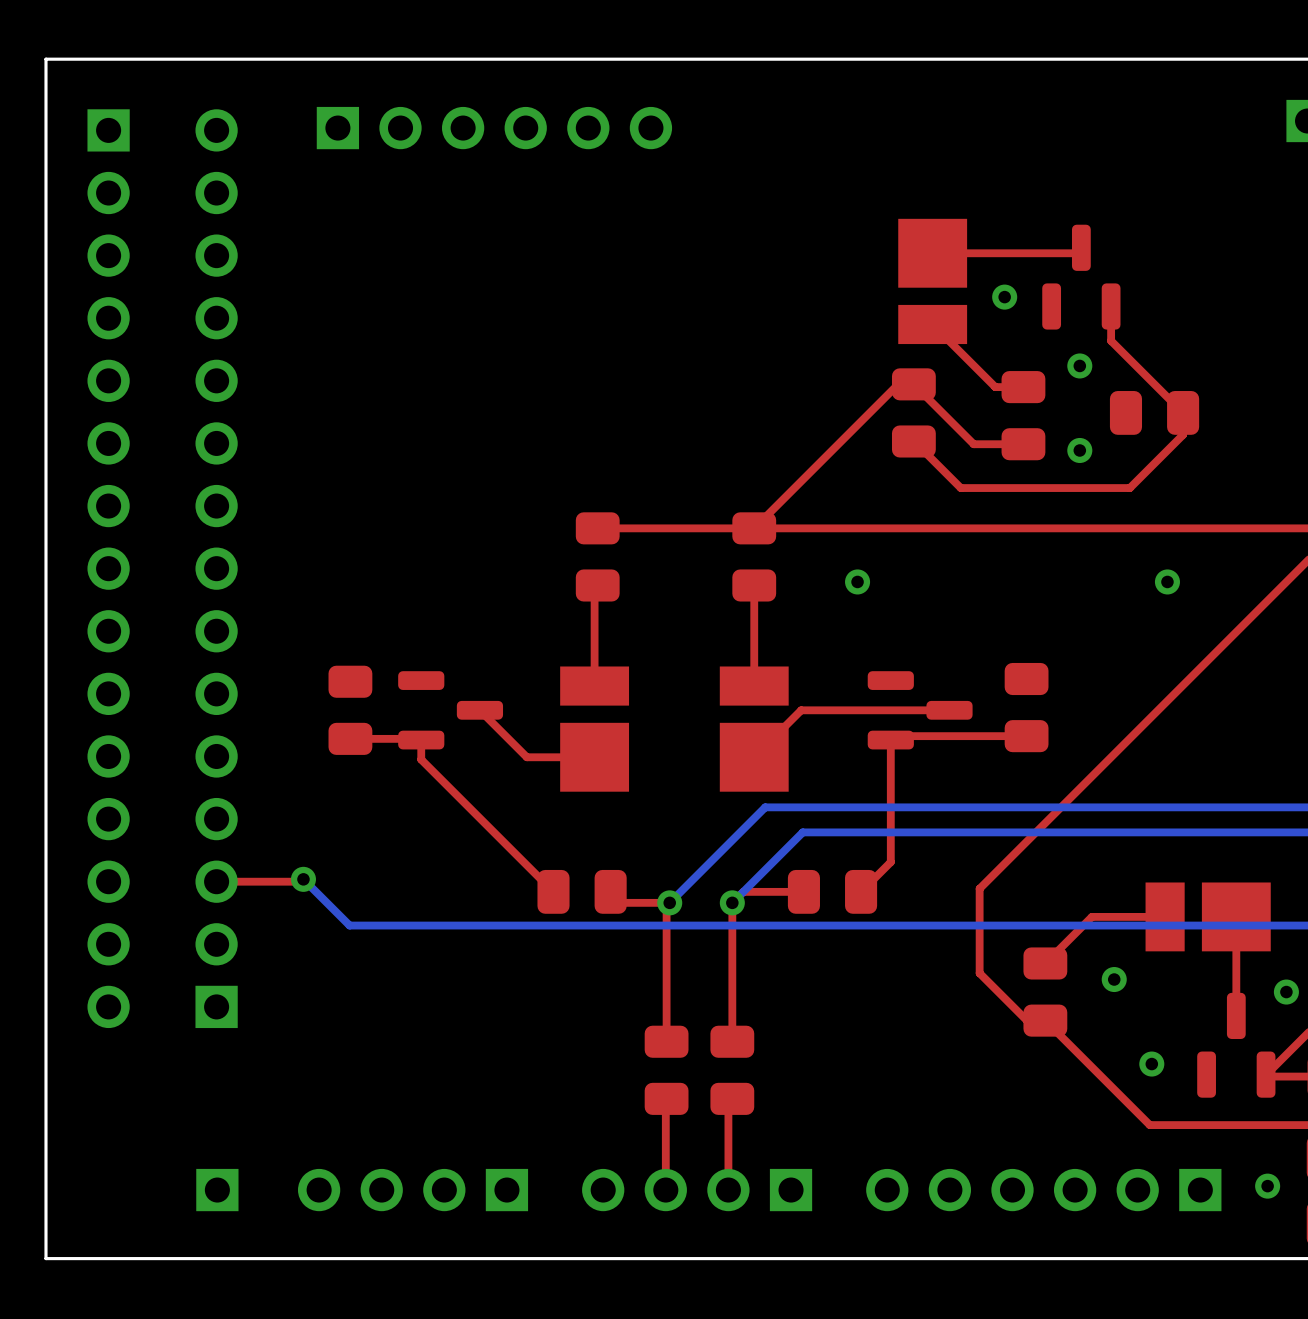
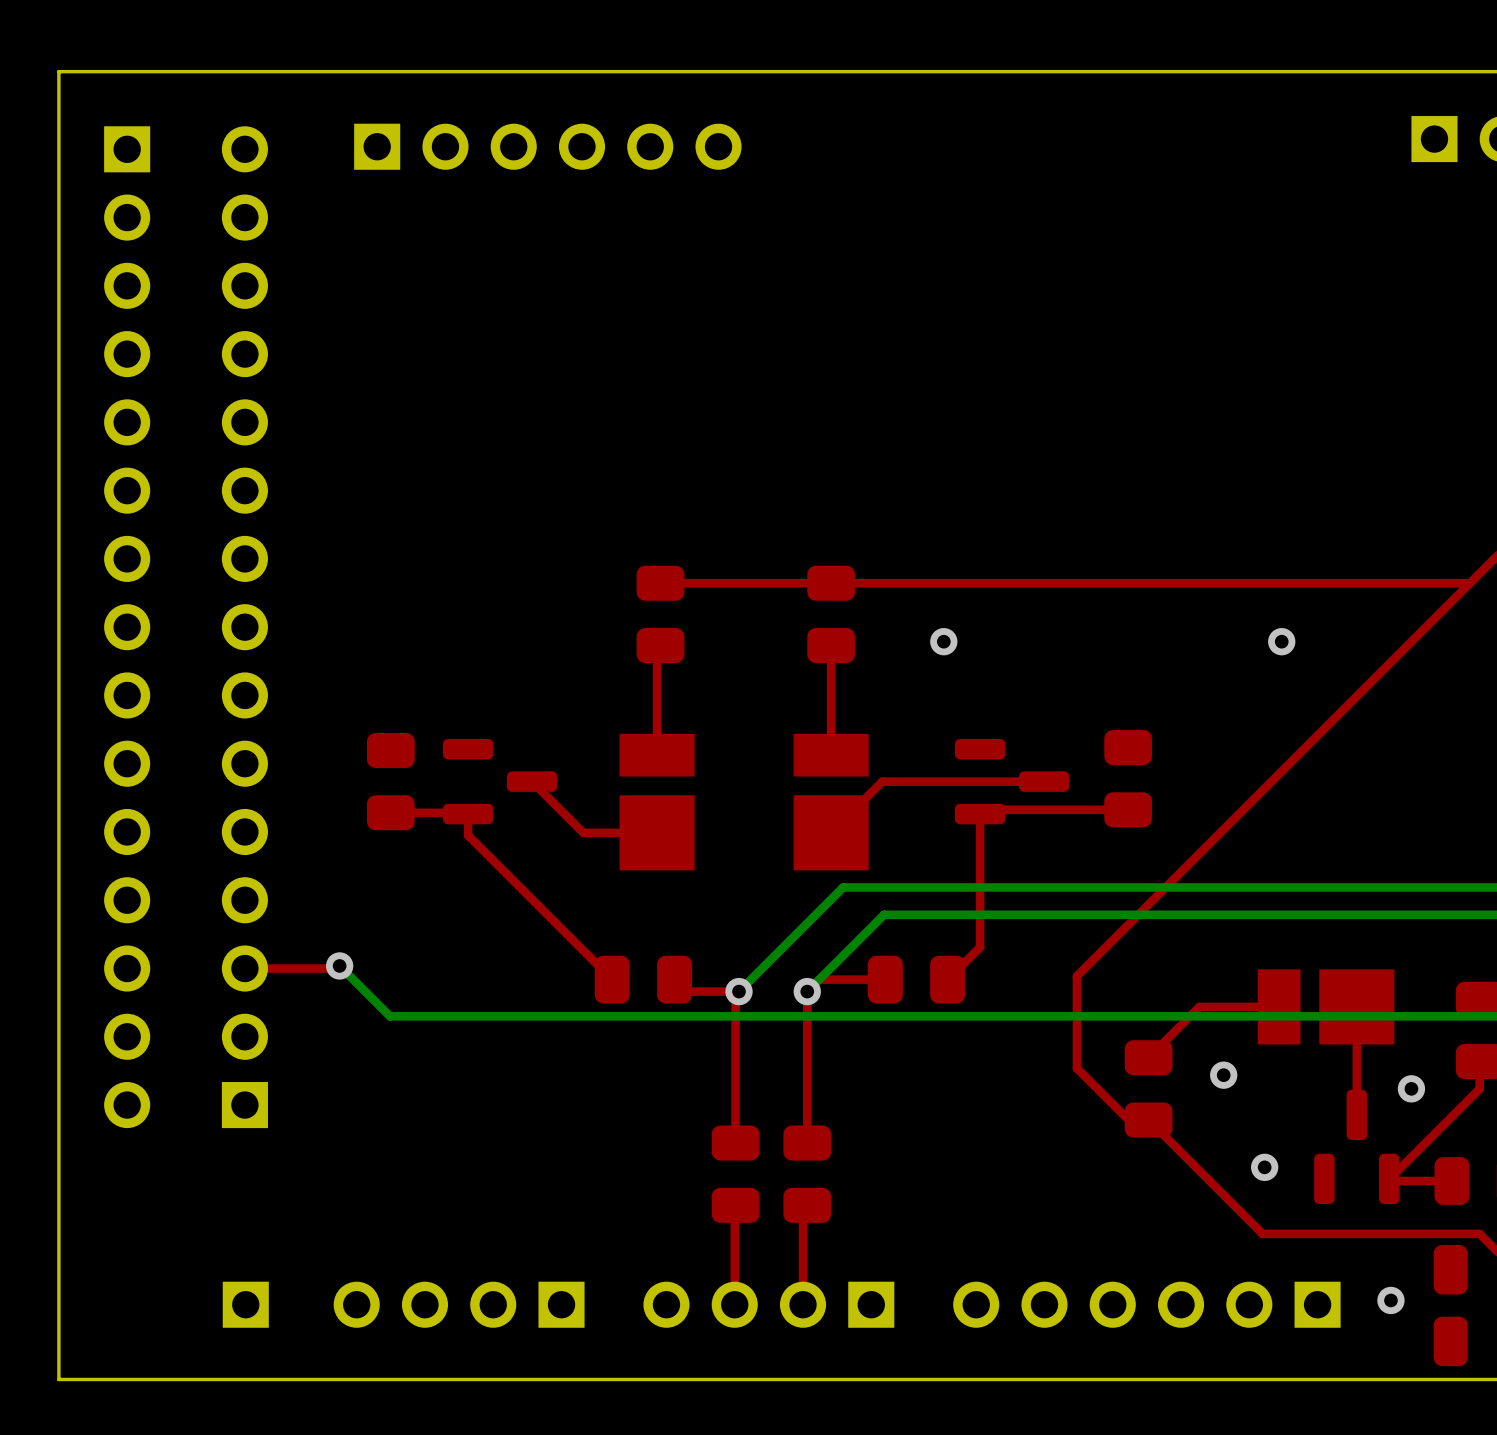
top track: (1081, 247) (1075, 253) (932, 253) -> none
part: (1081, 277) -> none
part: (932, 281) -> none
via: (1004, 297) -> none
top track: (1111, 306) (1111, 340) (1183, 412) (1183, 434) (1129, 488) (960, 488) (914, 441) -> none
top track: (932, 324) (995, 387) (1023, 387) -> none
via: (1079, 365) -> none
part: (913, 412) -> none
part: (1154, 412) -> none
part: (1023, 415) -> none
top track: (1023, 444) (973, 444) (913, 384) (898, 384) (754, 528) -> none
via: (1079, 450) -> none

